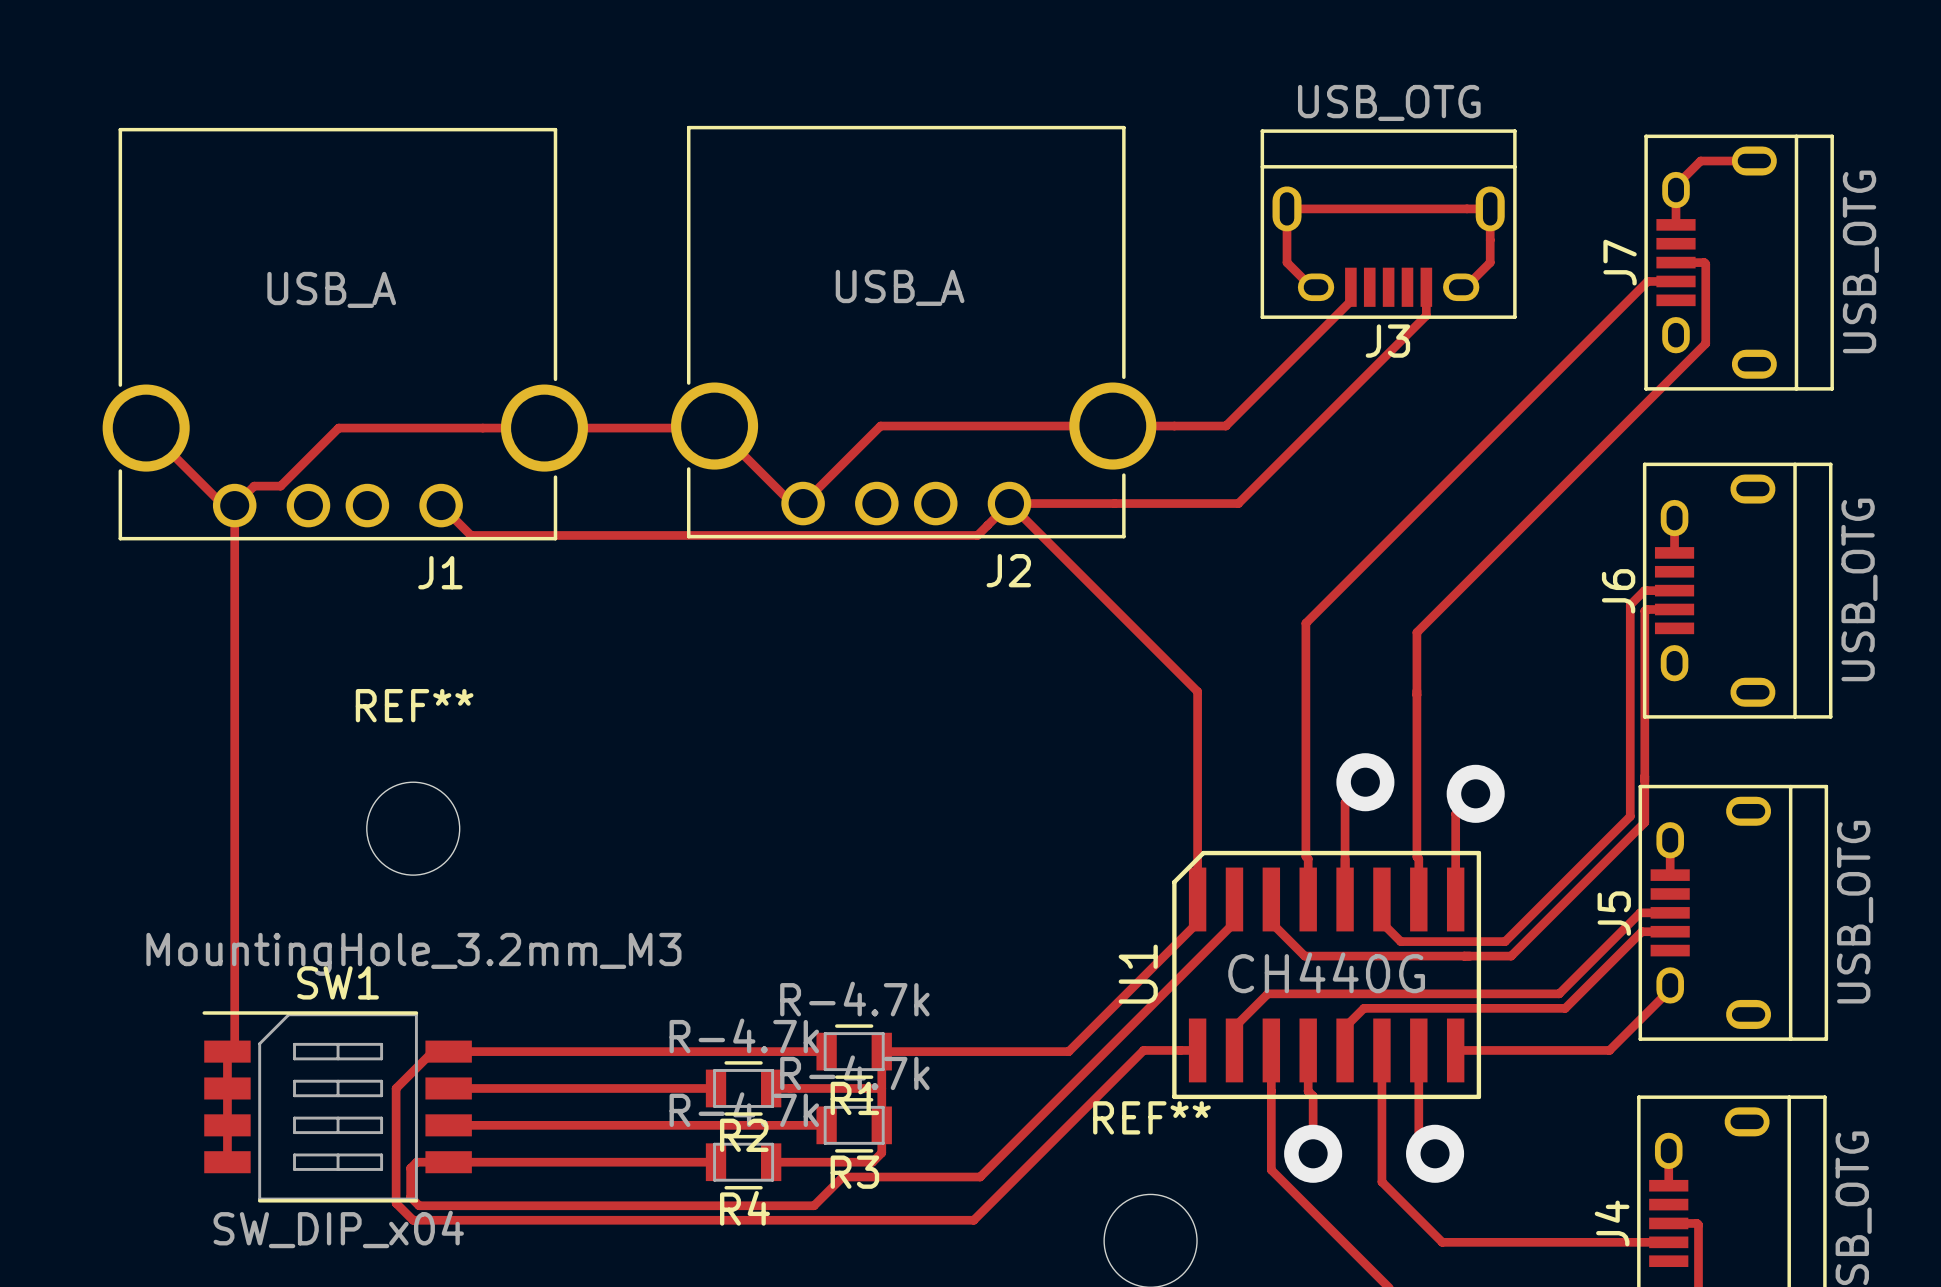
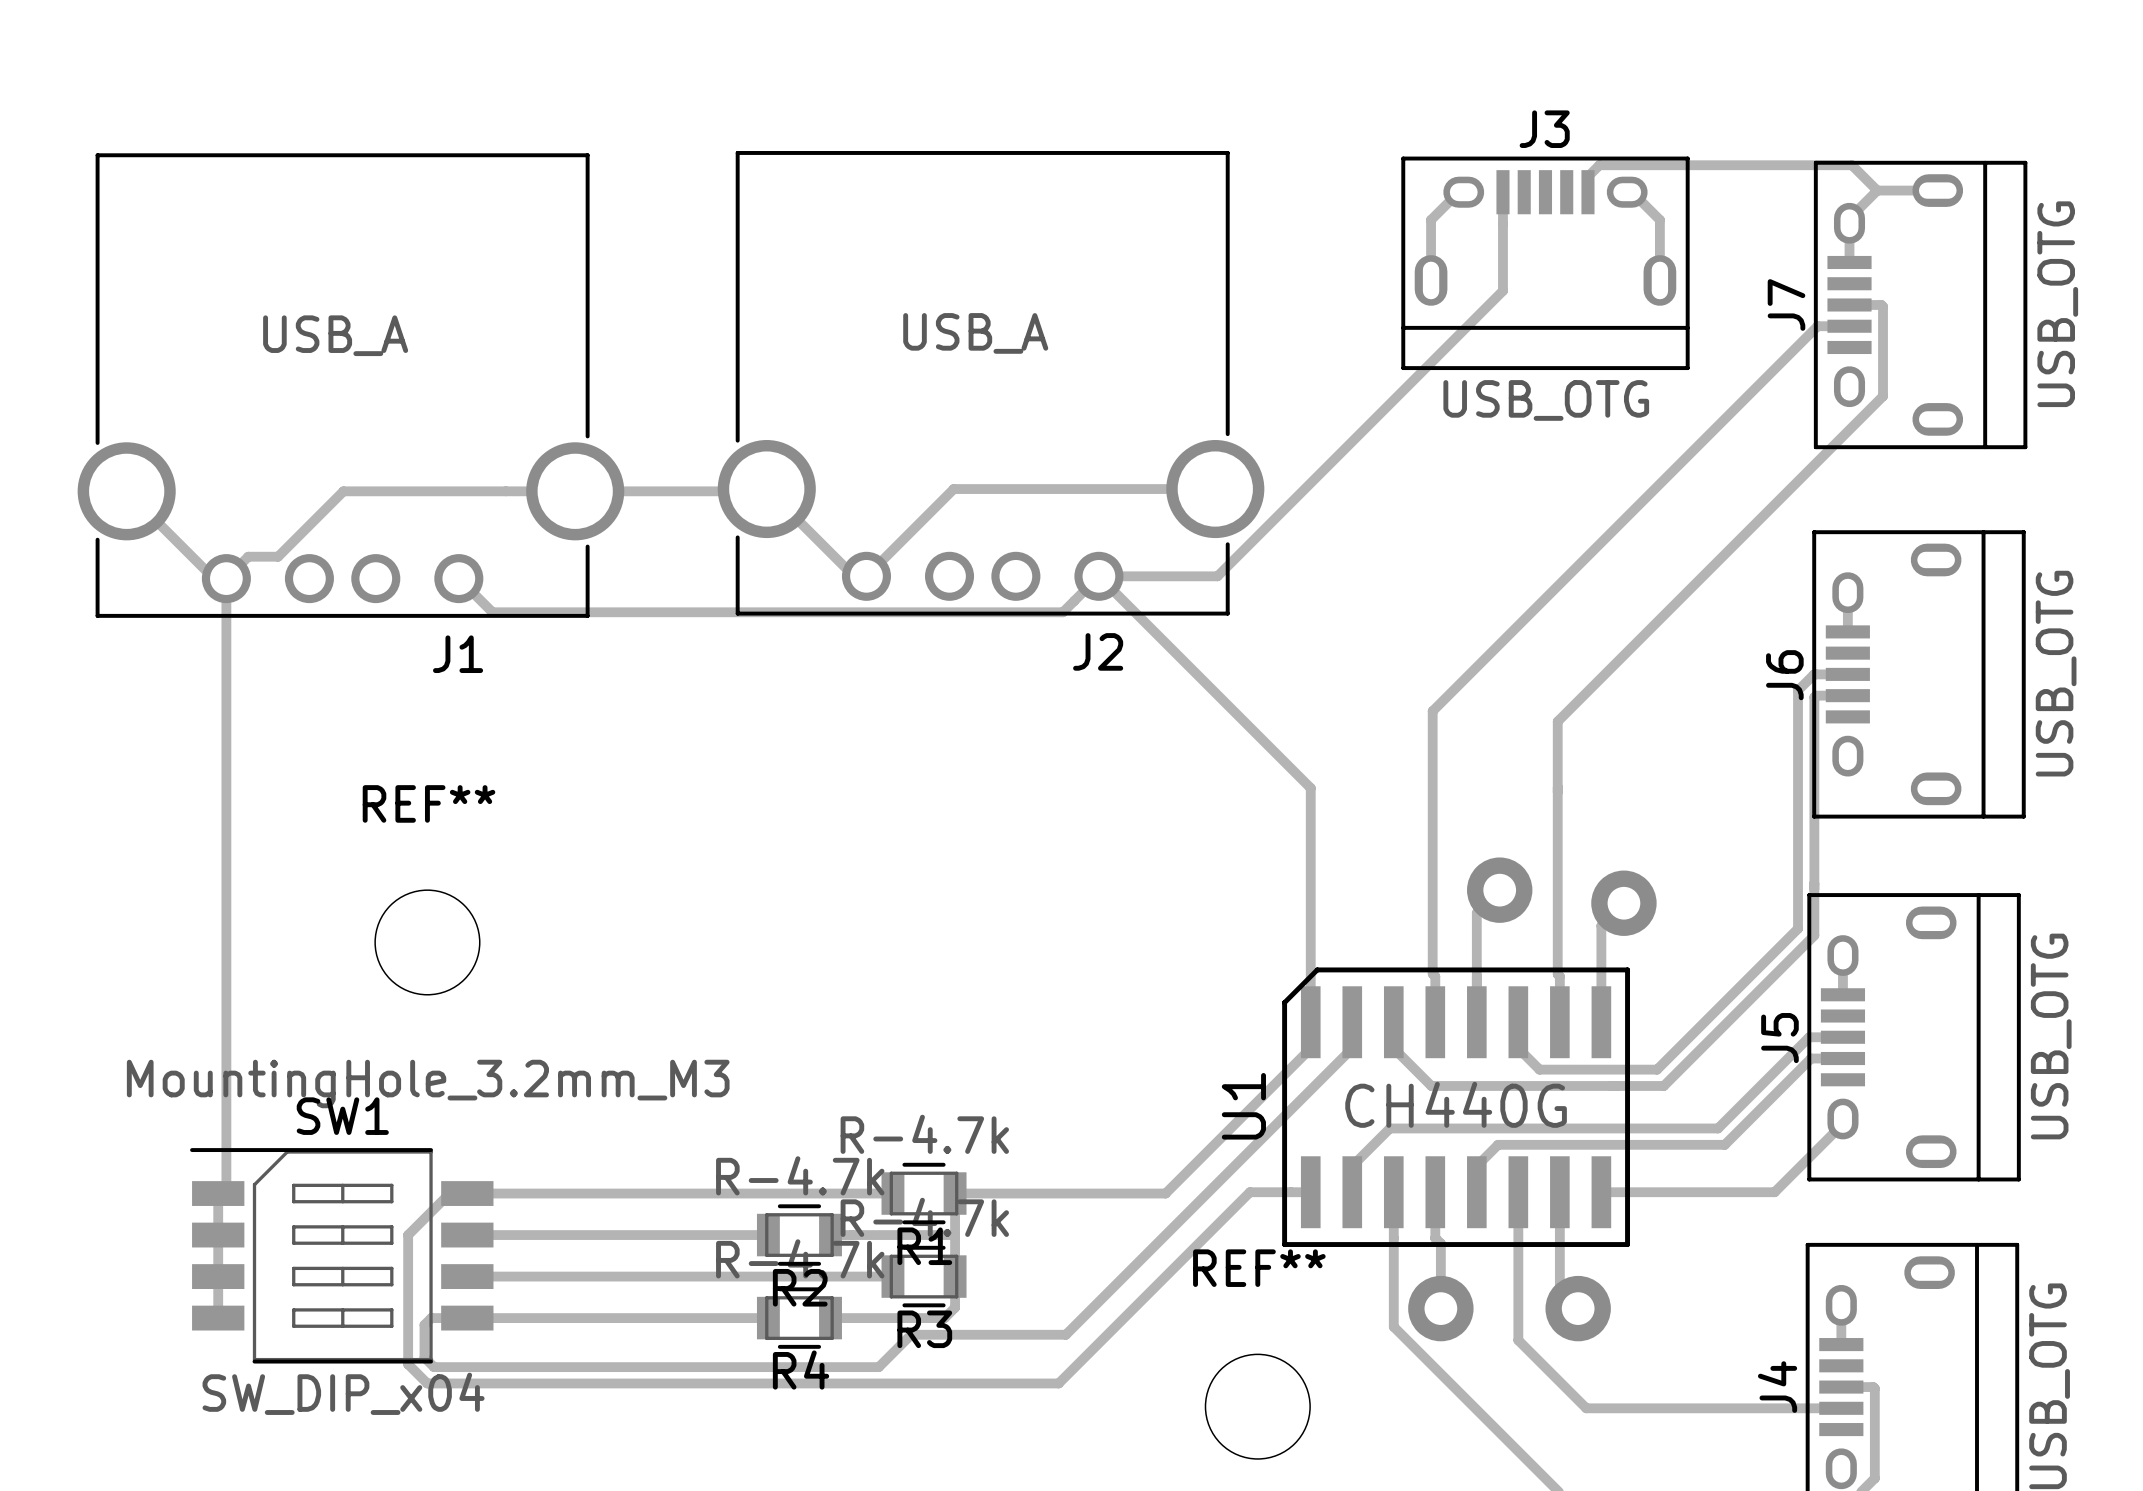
track: none -> (1877, 190) (1851, 165) (1599, 165) (1587, 176) (1587, 192)
track: none -> (1463, 192) (1458, 192) (1431, 219) (1431, 280)
track: none -> (1627, 192) (1632, 192) (1659, 219) (1659, 280)
J3 rotation: 0° (1388, 224) -> 180° (1545, 263)
track: (1316, 287) (1311, 287) (1287, 262) (1287, 208) (1490, 208) (1490, 262) (1465, 287) (1461, 287) -> none
track: (1350, 287) (1350, 301) (1225, 426) (1112, 426) -> none
track: (1426, 287) (1426, 315) (1238, 503) (1114, 503) -> (1502, 192) (1502, 290) (1217, 576)

